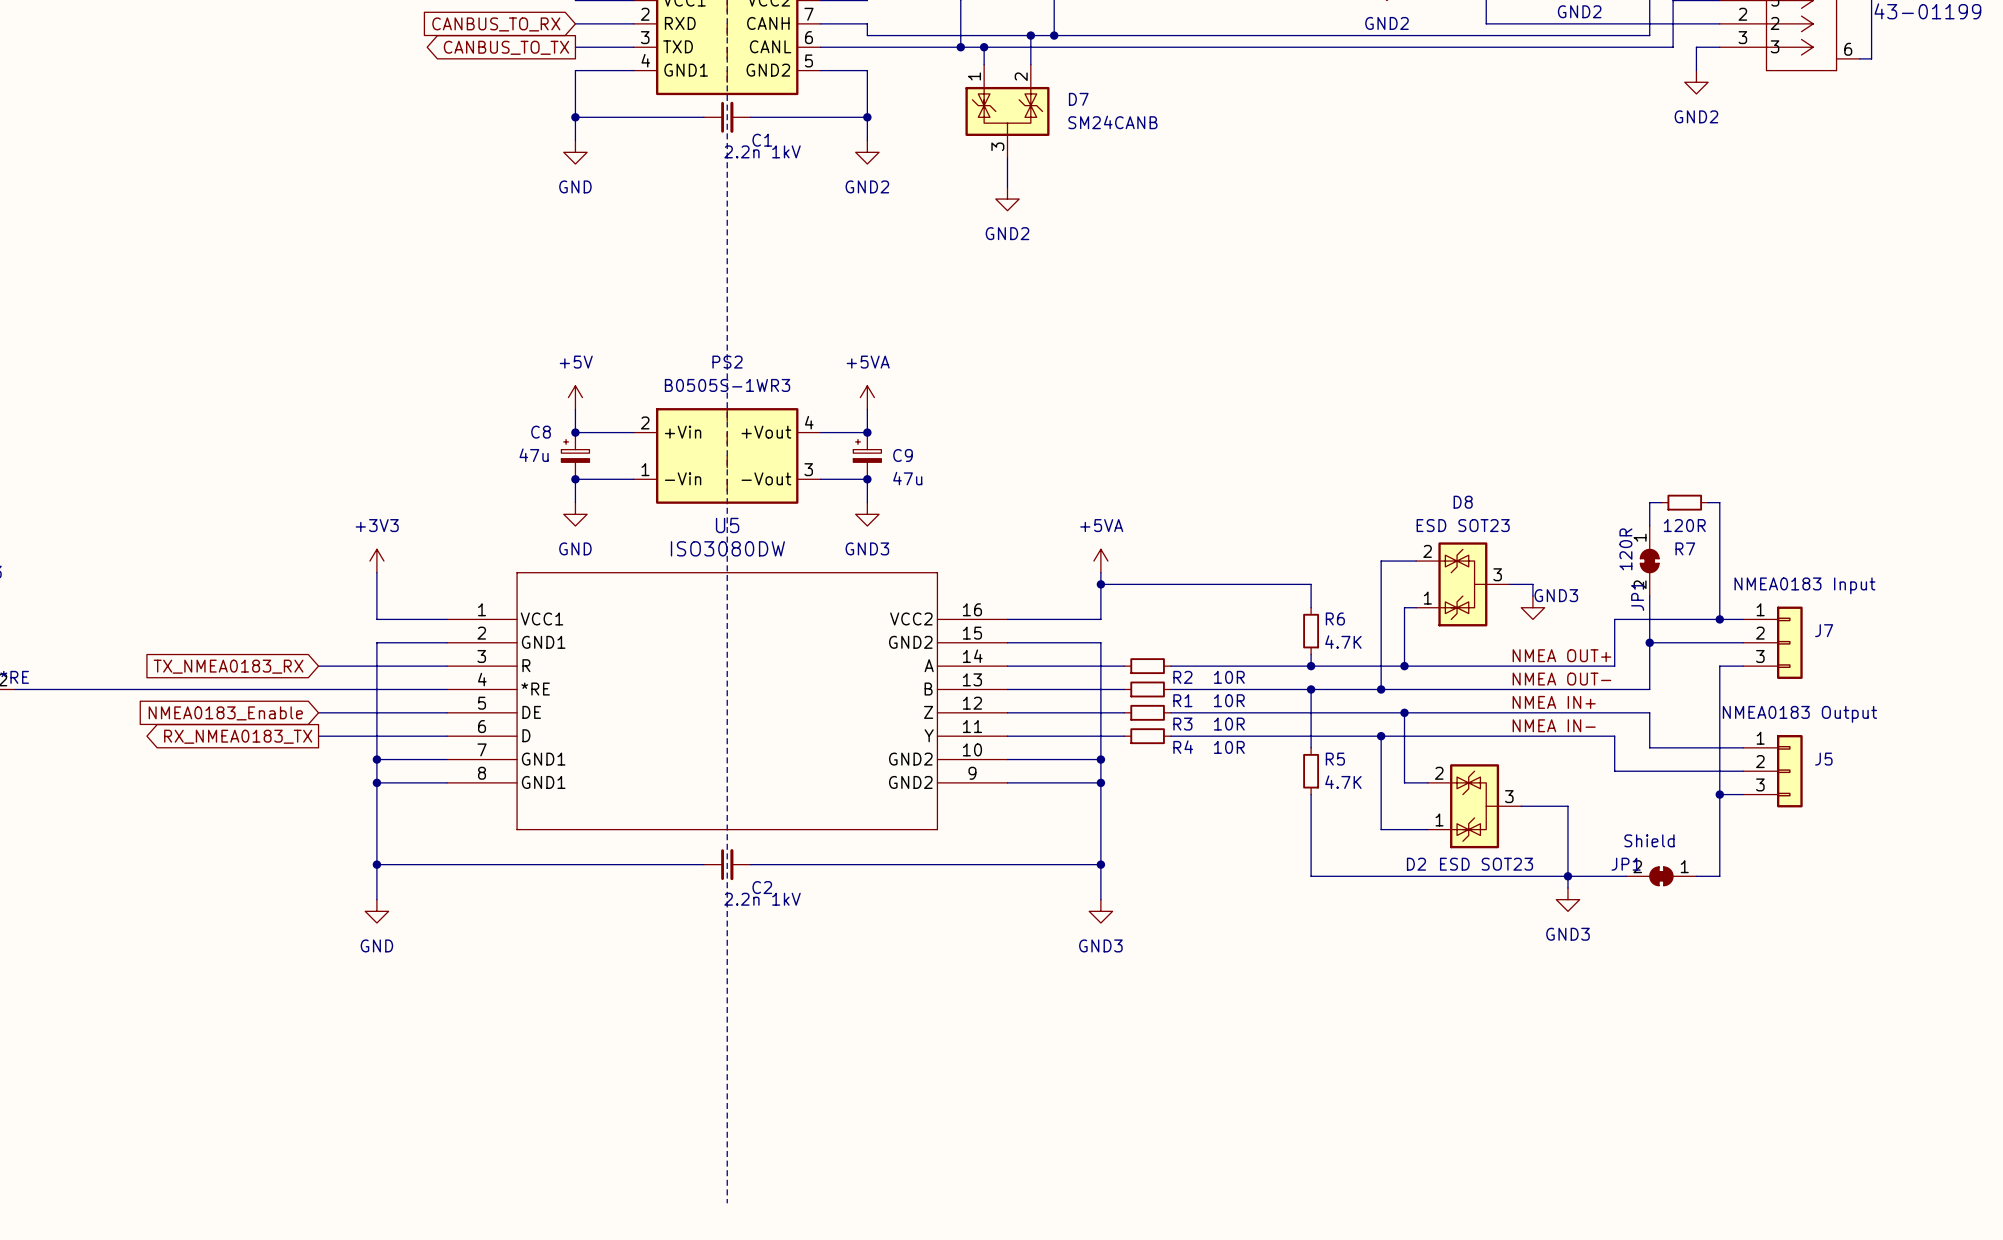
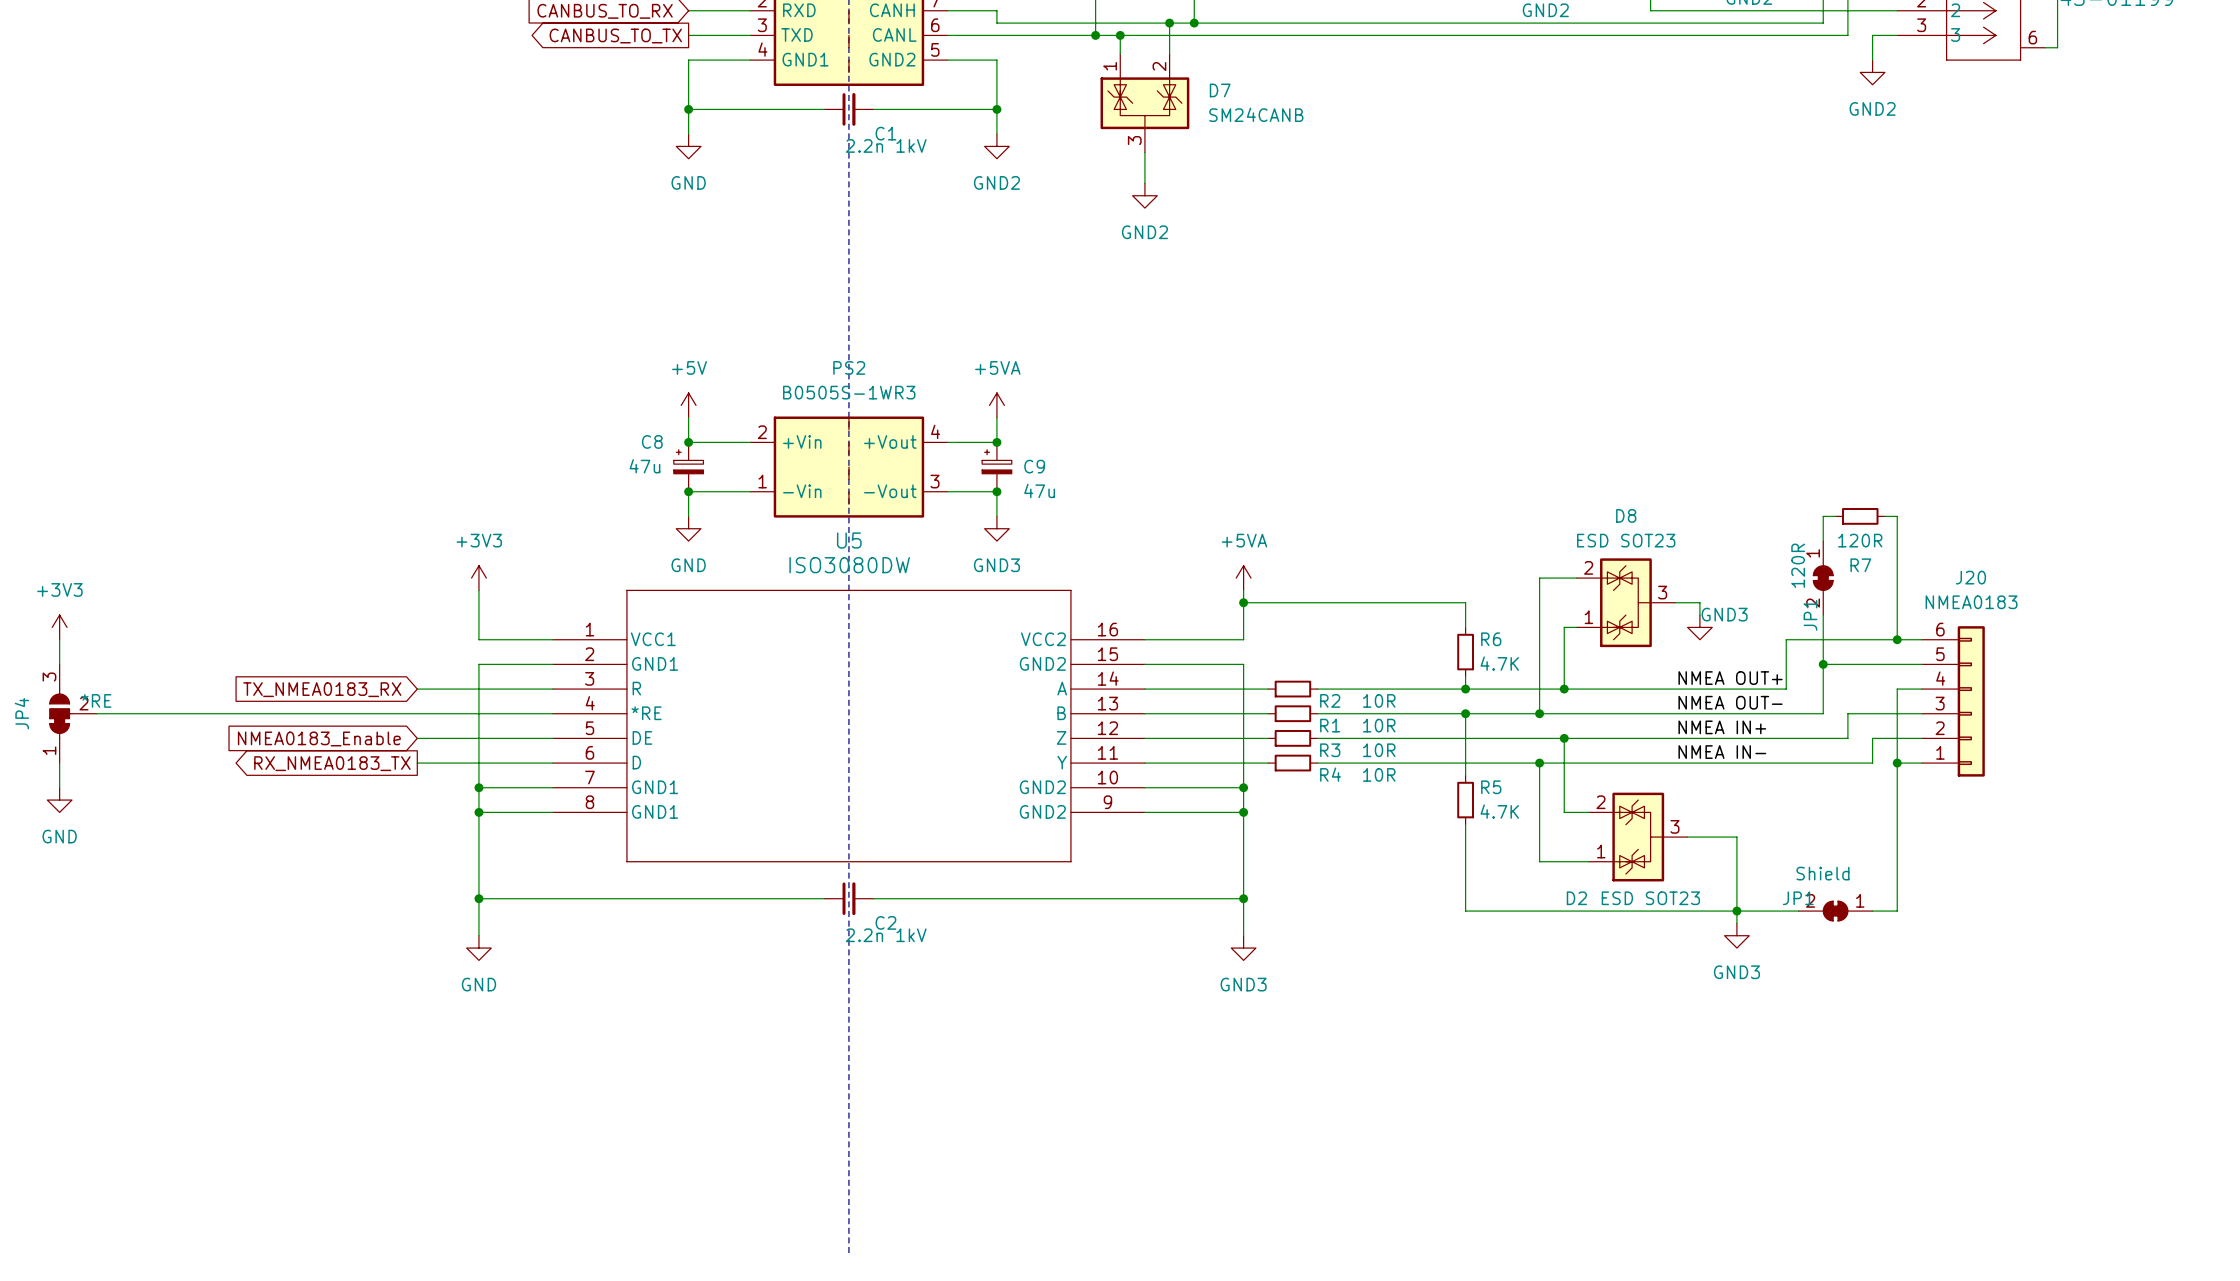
J7: NMEA0183 Input (1772, 642) -> none
J20: none -> NMEA0183 (1953, 701)
wire: (1649, 712) (1649, 747) (1743, 747) -> (1823, 738) (1847, 738) (1847, 713) (1921, 713)
wire: (1614, 736) (1614, 771) (1743, 771) -> (1786, 763) (1872, 763) (1872, 738) (1921, 738)
junction: none -> (1897, 763)
J5: NMEA0183 Output (1772, 771) -> none
wire: (1719, 794) (1743, 794) -> (1897, 763) (1921, 763)
junction: (1719, 794) -> none

